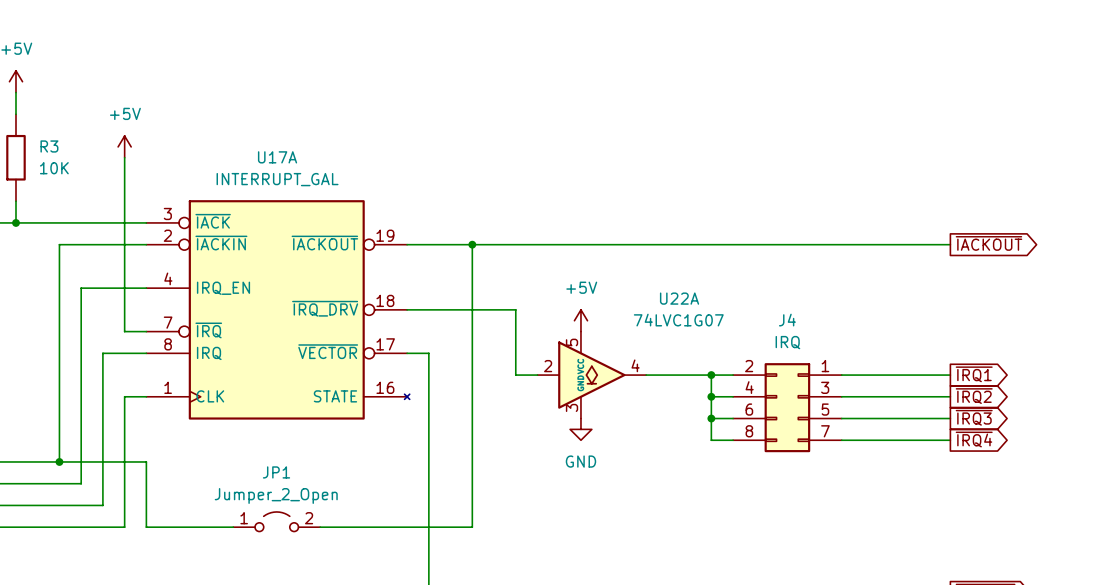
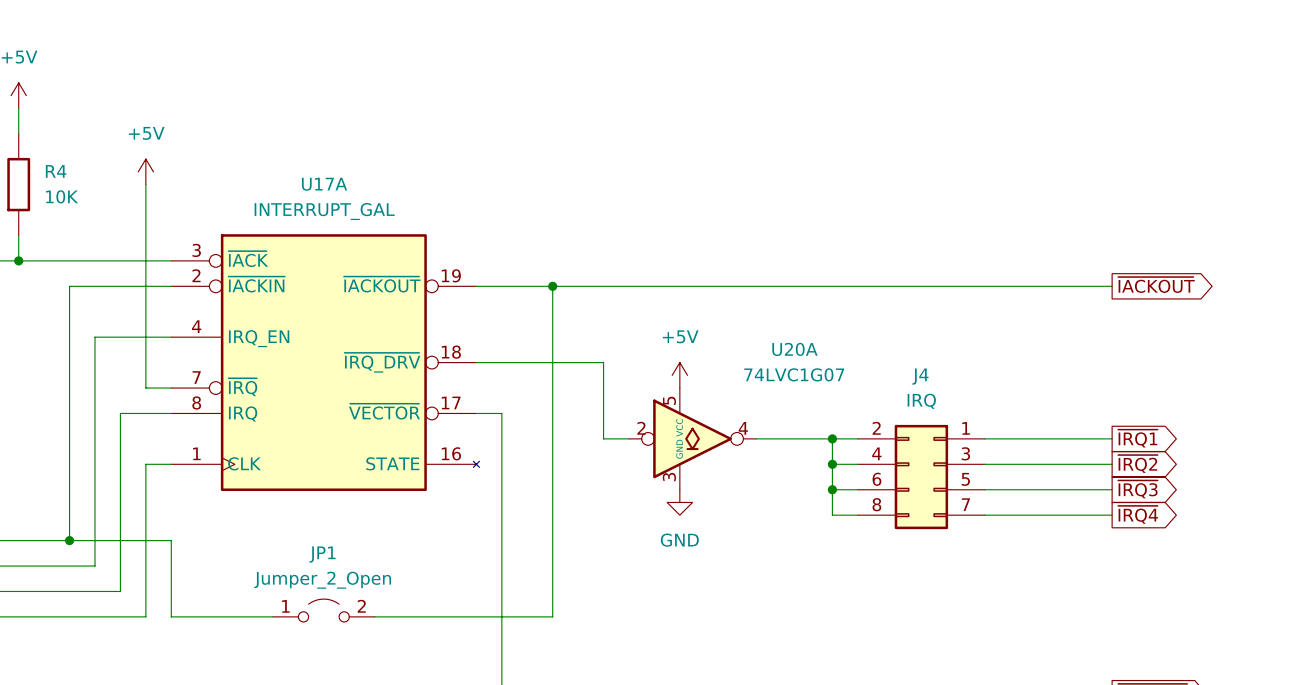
R3 name: R3 (49, 146) -> R4 (56, 171)
U22A: 74LVC1G07 (591, 375) -> none
U20A: none -> 74LVC1G07 (692, 438)

